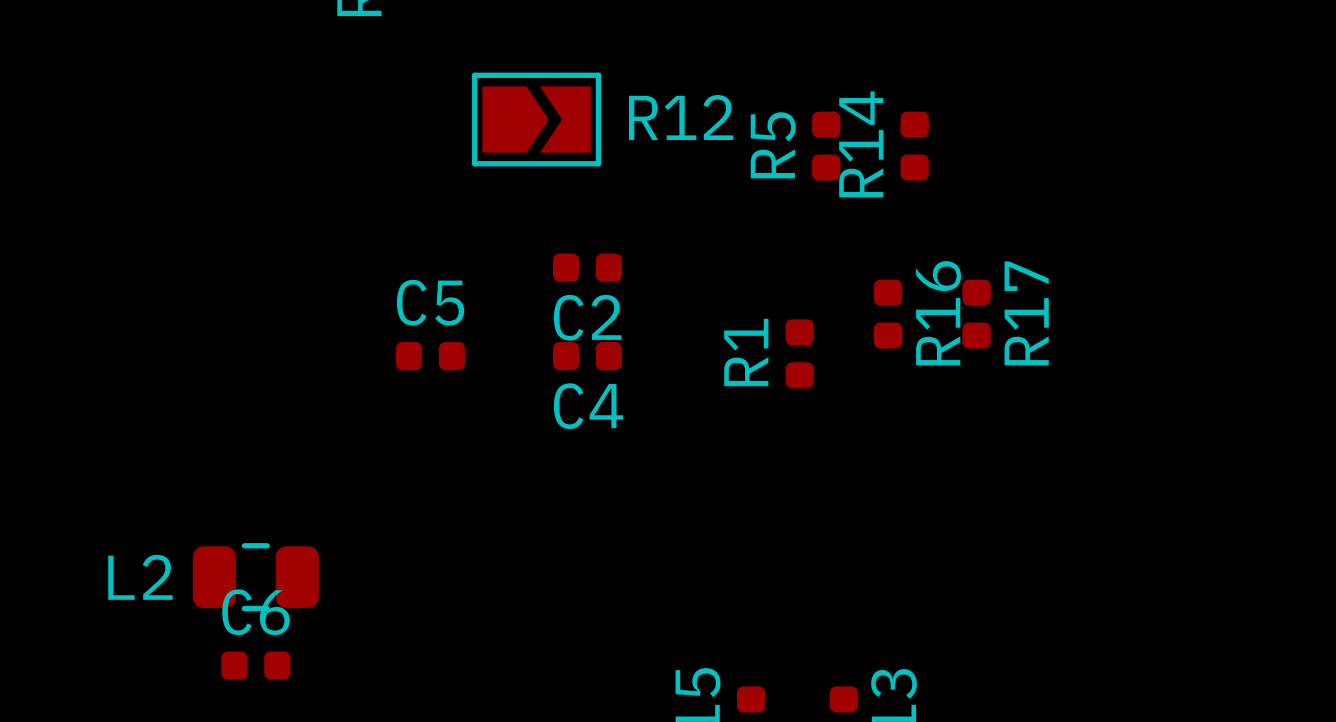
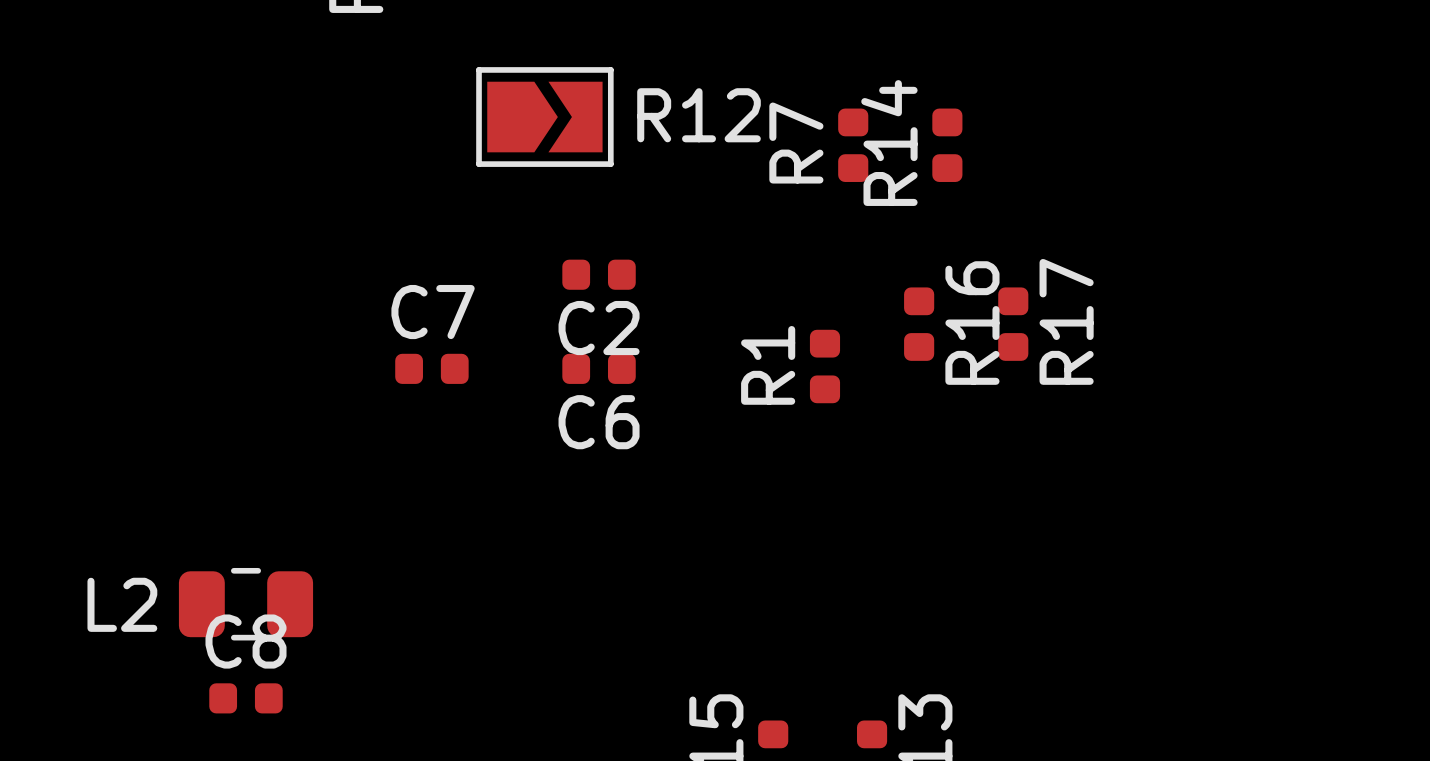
R5 name: R5 (773, 145) -> R7 (796, 143)
C5 name: C5 (430, 302) -> C7 (433, 312)
C4 name: C4 (588, 406) -> C6 (599, 422)
C6 name: C6 (256, 612) -> C8 (245, 641)

